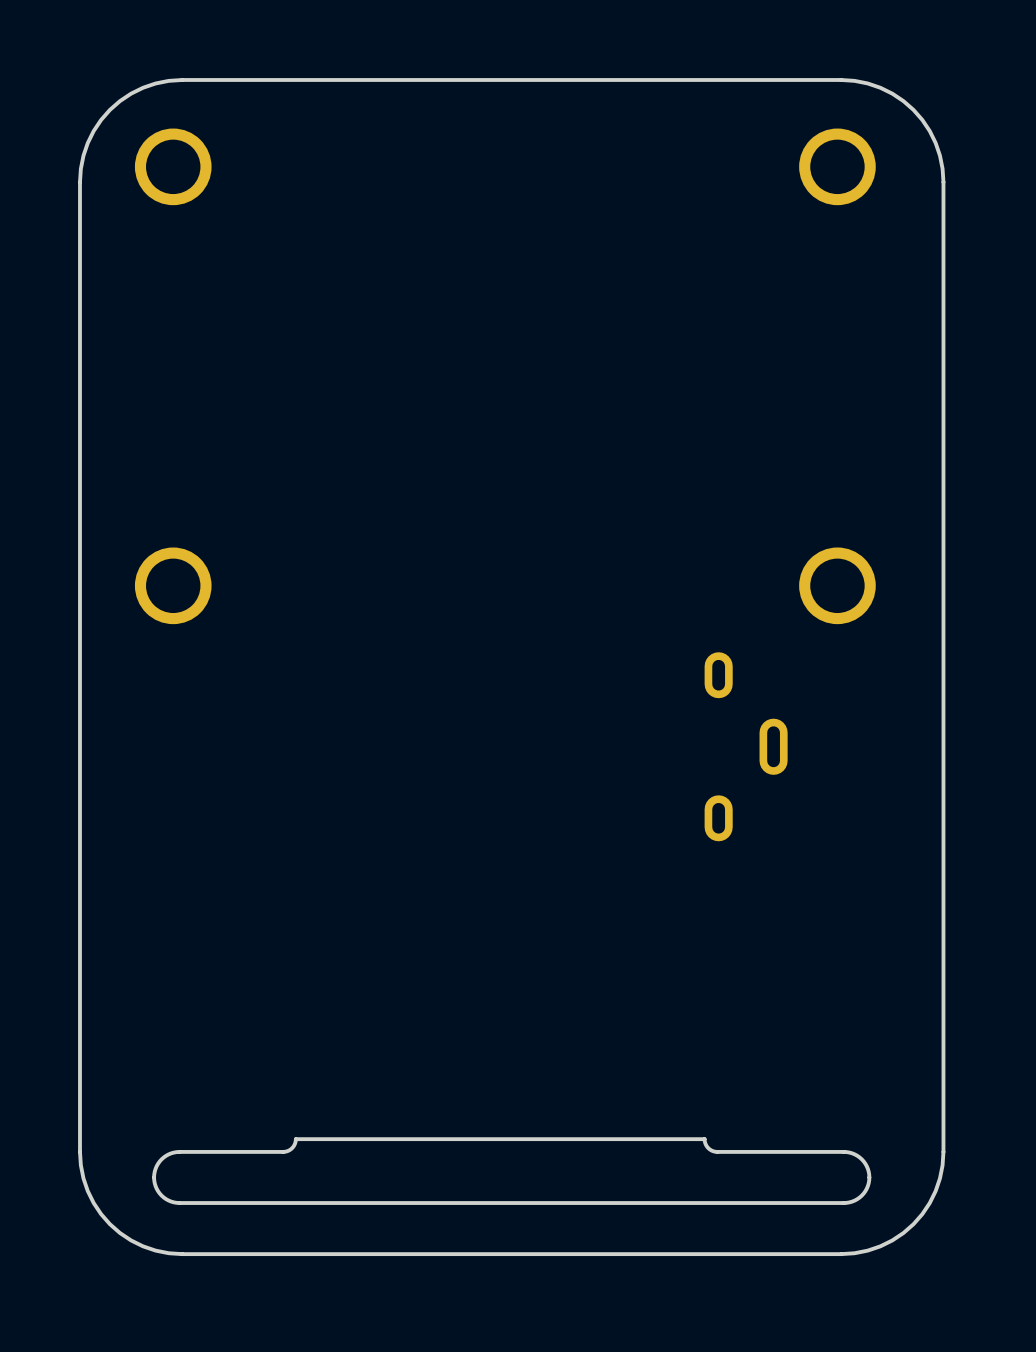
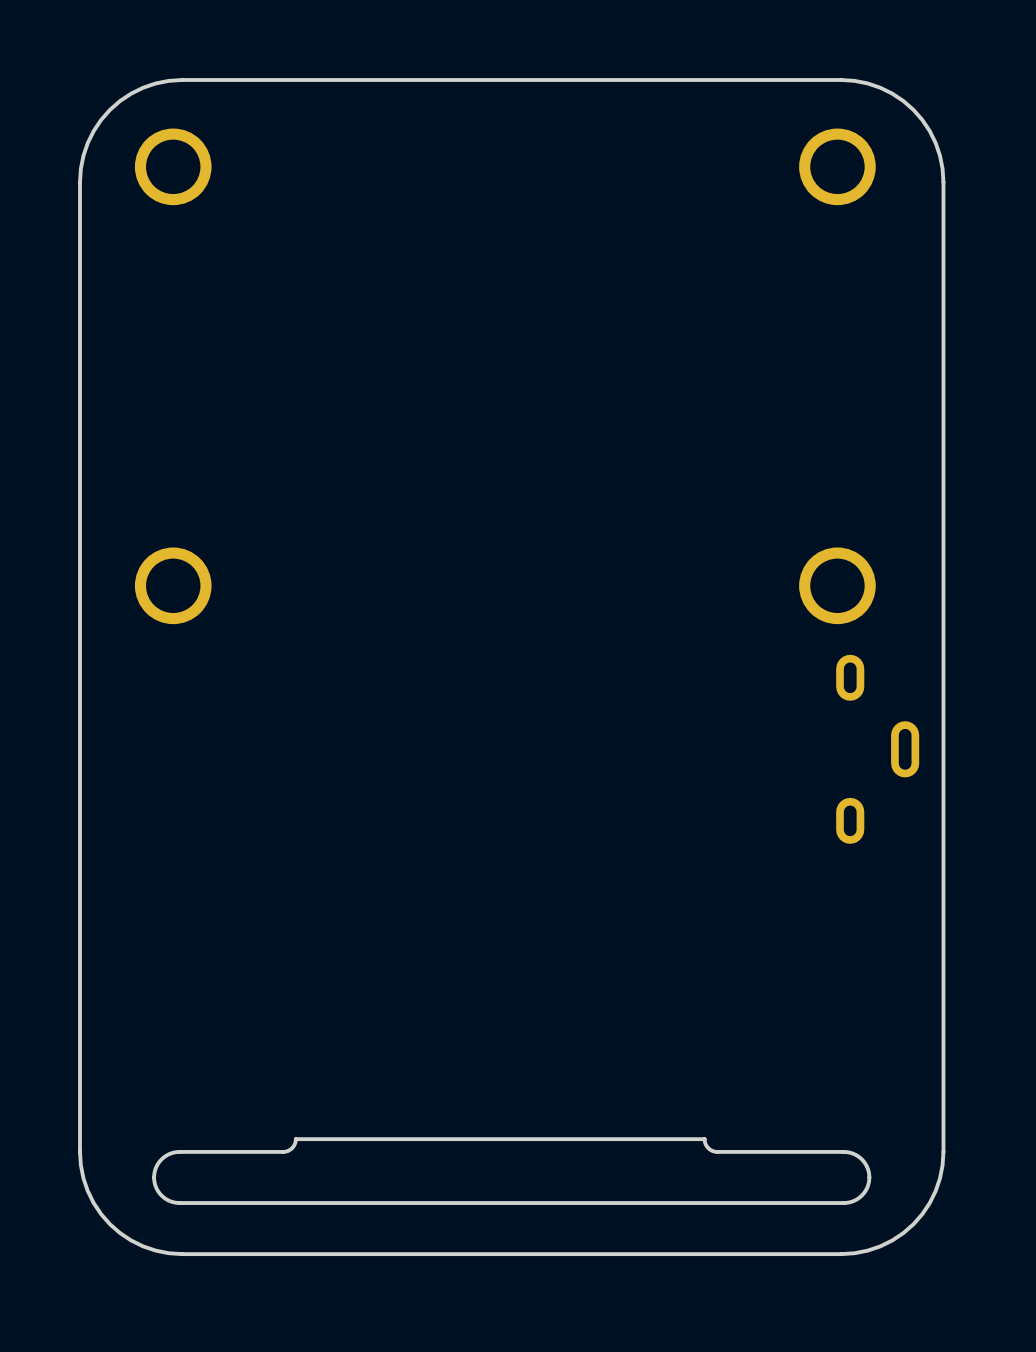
part position: (746, 746) -> (877, 749)

